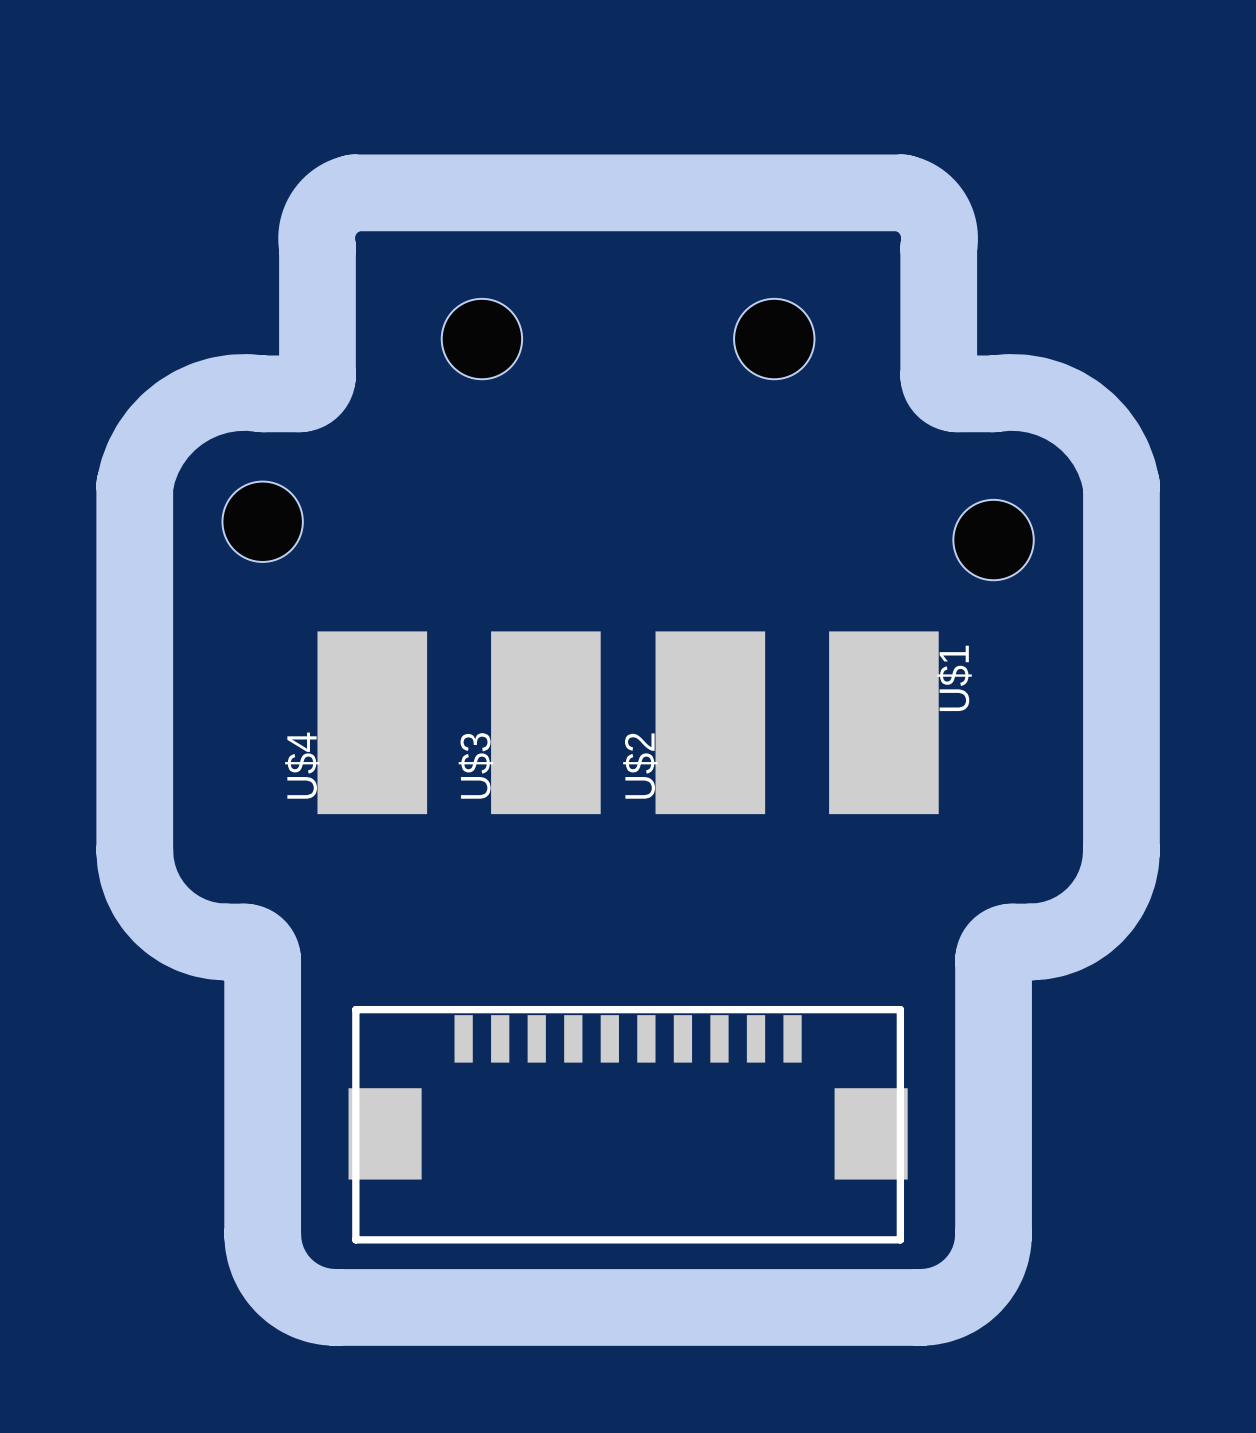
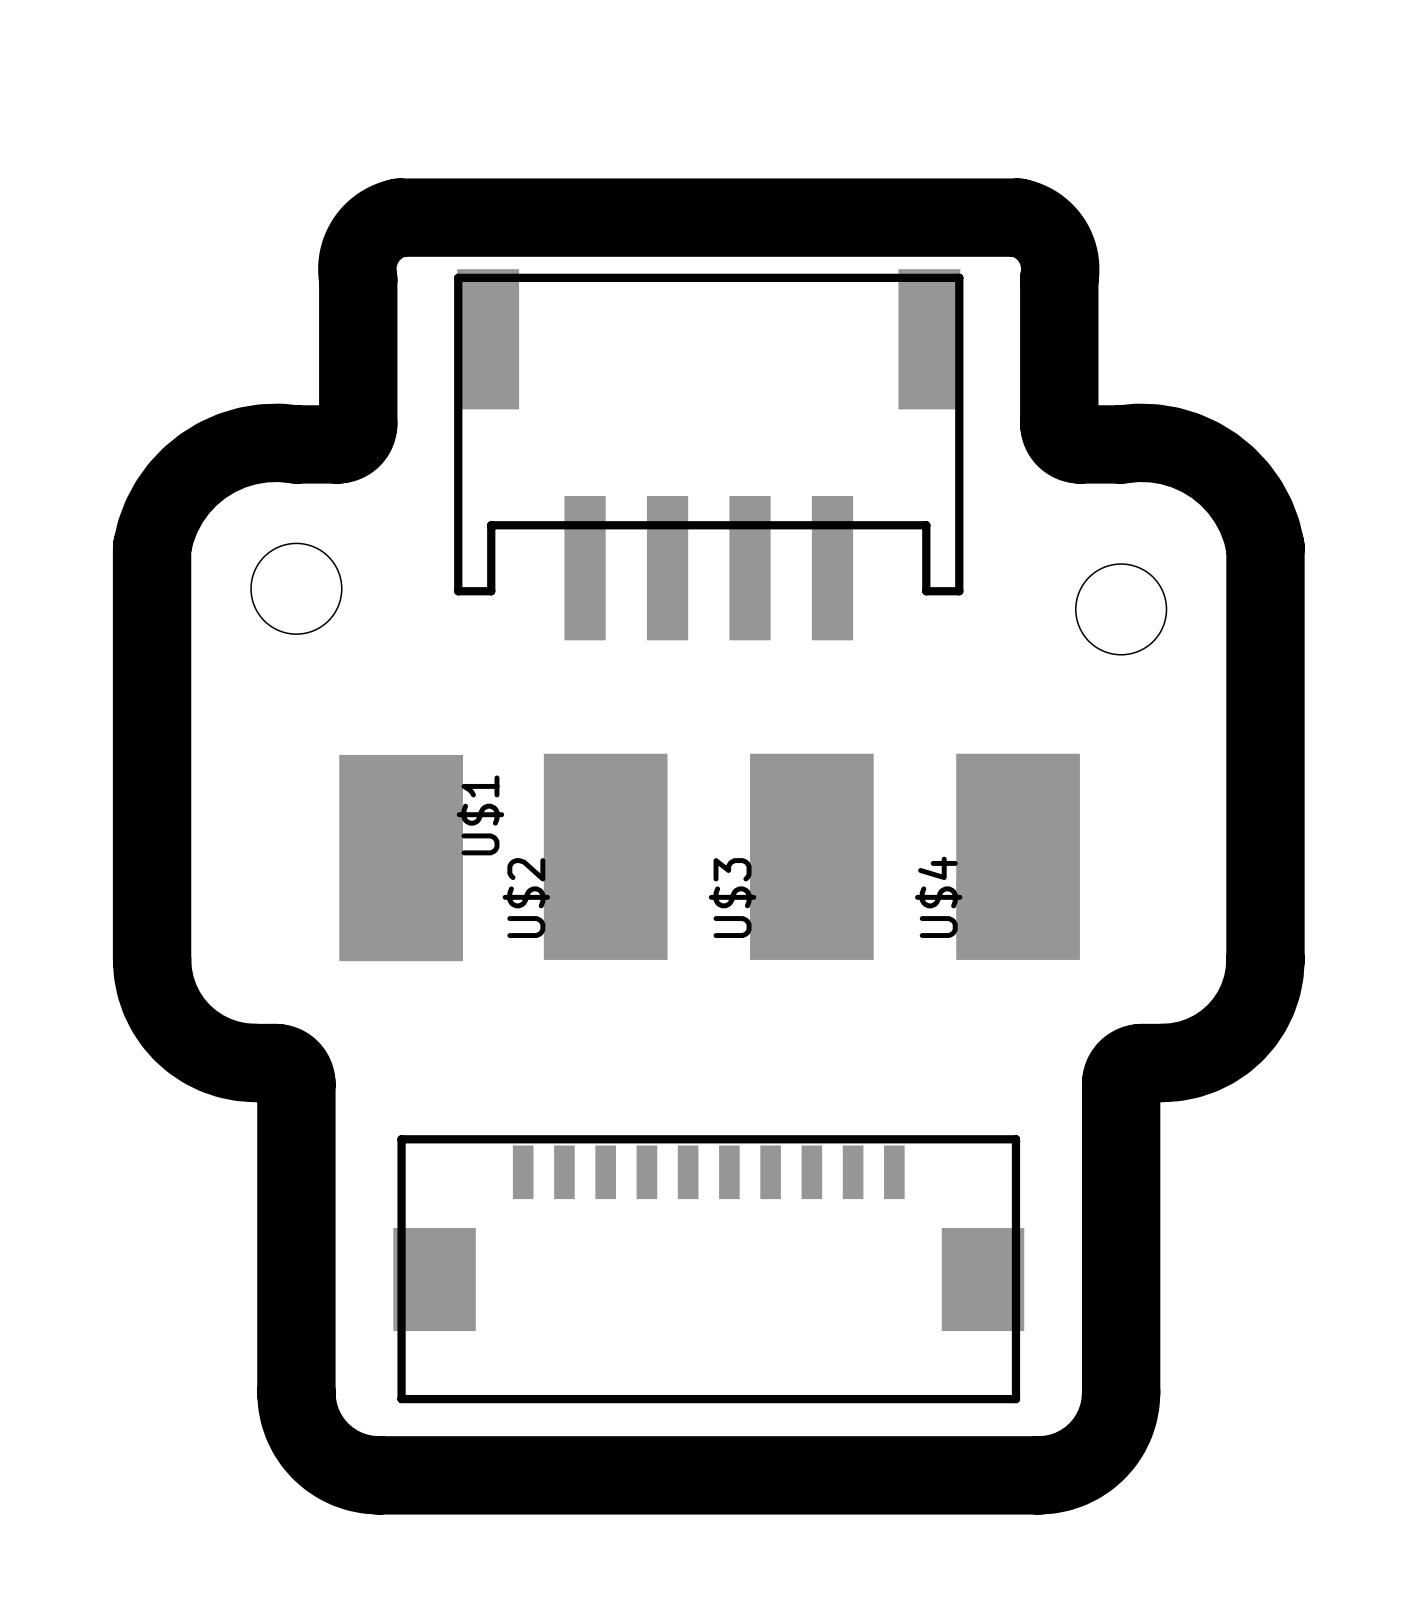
board edge width: thick (354, 192) (902, 192) (908, 194) (918, 199) (928, 207) (934, 217) (938, 229) (938, 375) (942, 386) (954, 393) (1022, 392) (1050, 399) (1076, 413) (1087, 422) (1106, 444) (1118, 471) (1121, 485) (1120, 862) (1114, 885) (1109, 896) (1094, 915) (1085, 923) (1075, 929) (1053, 938) (1007, 942) (998, 947) (994, 953) (992, 1243) (983, 1270) (972, 1286) (957, 1297) (939, 1304) (920, 1307) (335, 1307) (316, 1304) (299, 1297) (284, 1286) (272, 1270) (265, 1253) (262, 1234) (262, 955) (257, 947) (251, 943) (202, 938) (180, 929) (170, 923) (161, 915) (146, 896) (141, 885) (135, 862) (134, 485) (143, 457) (158, 432) (179, 413) (192, 405) (205, 399) (233, 392) (301, 393) (313, 386) (317, 375) (317, 229) (321, 217) (328, 207) (337, 199) (354, 192) -> thin (399, 217) (1018, 217) (1024, 219) (1037, 225) (1047, 234) (1054, 245) (1059, 258) (1059, 423) (1063, 436) (1069, 441) (1077, 444) (1153, 443) (1185, 450) (1214, 466) (1227, 476) (1248, 501) (1261, 531) (1265, 547) (1264, 973) (1257, 999) (1251, 1011) (1235, 1032) (1225, 1041) (1213, 1049) (1189, 1059) (1175, 1062) (1136, 1063) (1127, 1069) (1122, 1075) (1121, 1083) (1120, 1403) (1110, 1434) (1096, 1451) (1079, 1464) (1060, 1472) (1038, 1475) (378, 1475) (357, 1472) (337, 1464) (320, 1451) (307, 1434) (299, 1414) (296, 1392) (295, 1078) (290, 1069) (283, 1064) (228, 1059) (203, 1049) (192, 1041) (182, 1032) (165, 1011) (159, 999) (152, 973) (152, 547) (161, 516) (178, 488) (202, 466) (216, 457) (231, 450) (263, 443) (340, 444) (347, 441) (353, 436) (358, 423) (358, 258) (362, 245) (370, 234) (380, 225) (399, 217)
hole: (481, 339) -> none
hole: (774, 339) -> none
part: none -> (708, 454)
U$4 position: (372, 722) -> (1018, 856)
U$3 position: (545, 722) -> (811, 856)
U$2 position: (710, 722) -> (605, 856)
U$1 position: (883, 722) -> (401, 858)

